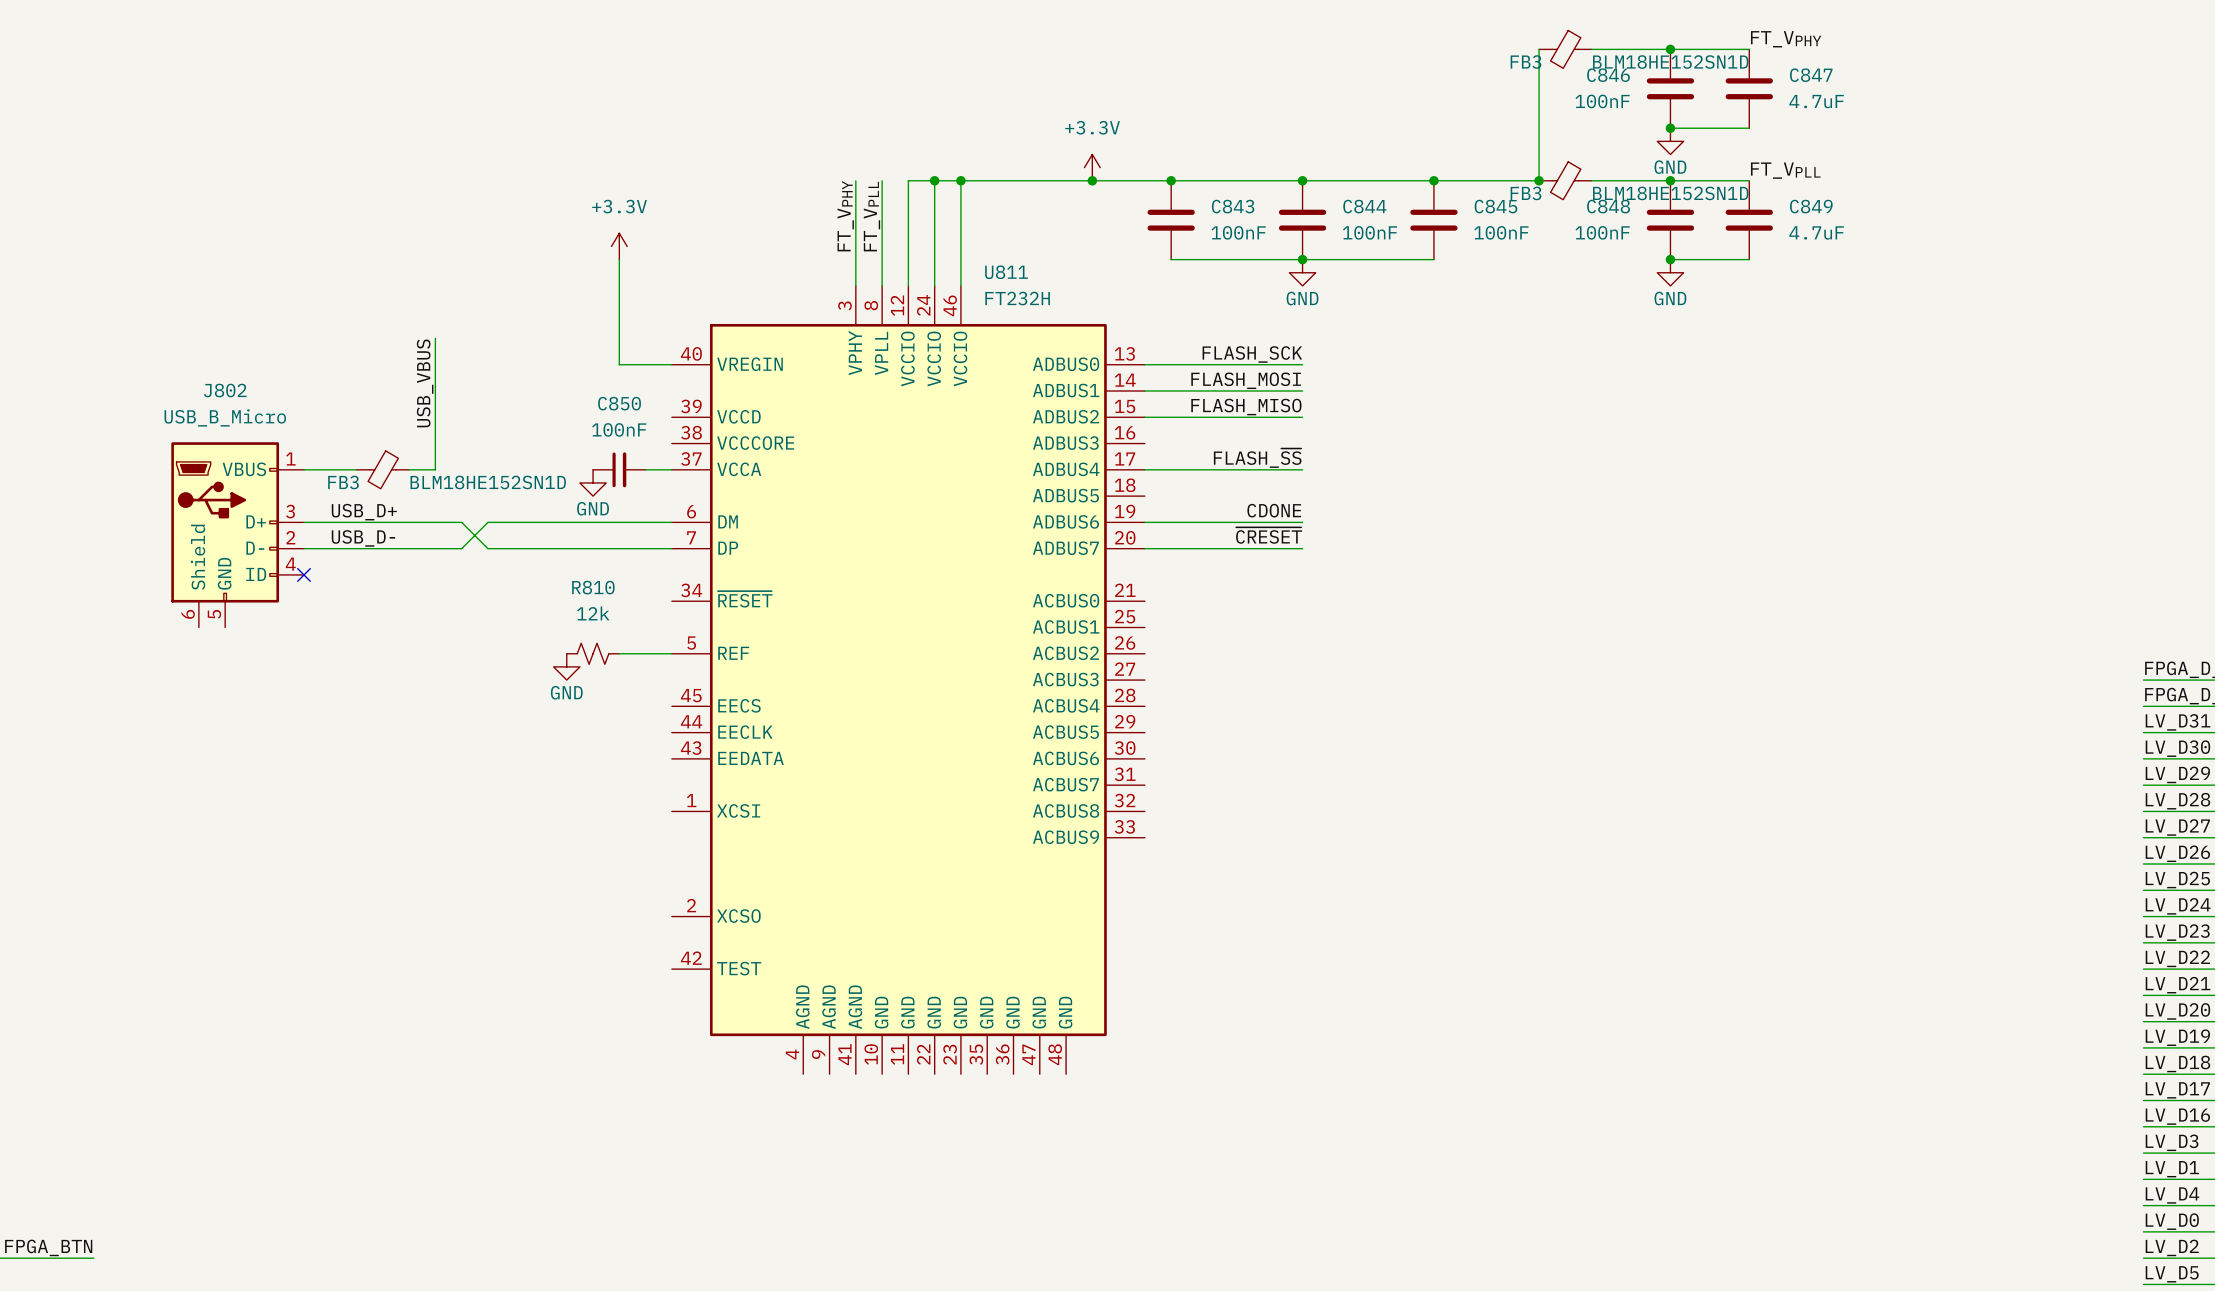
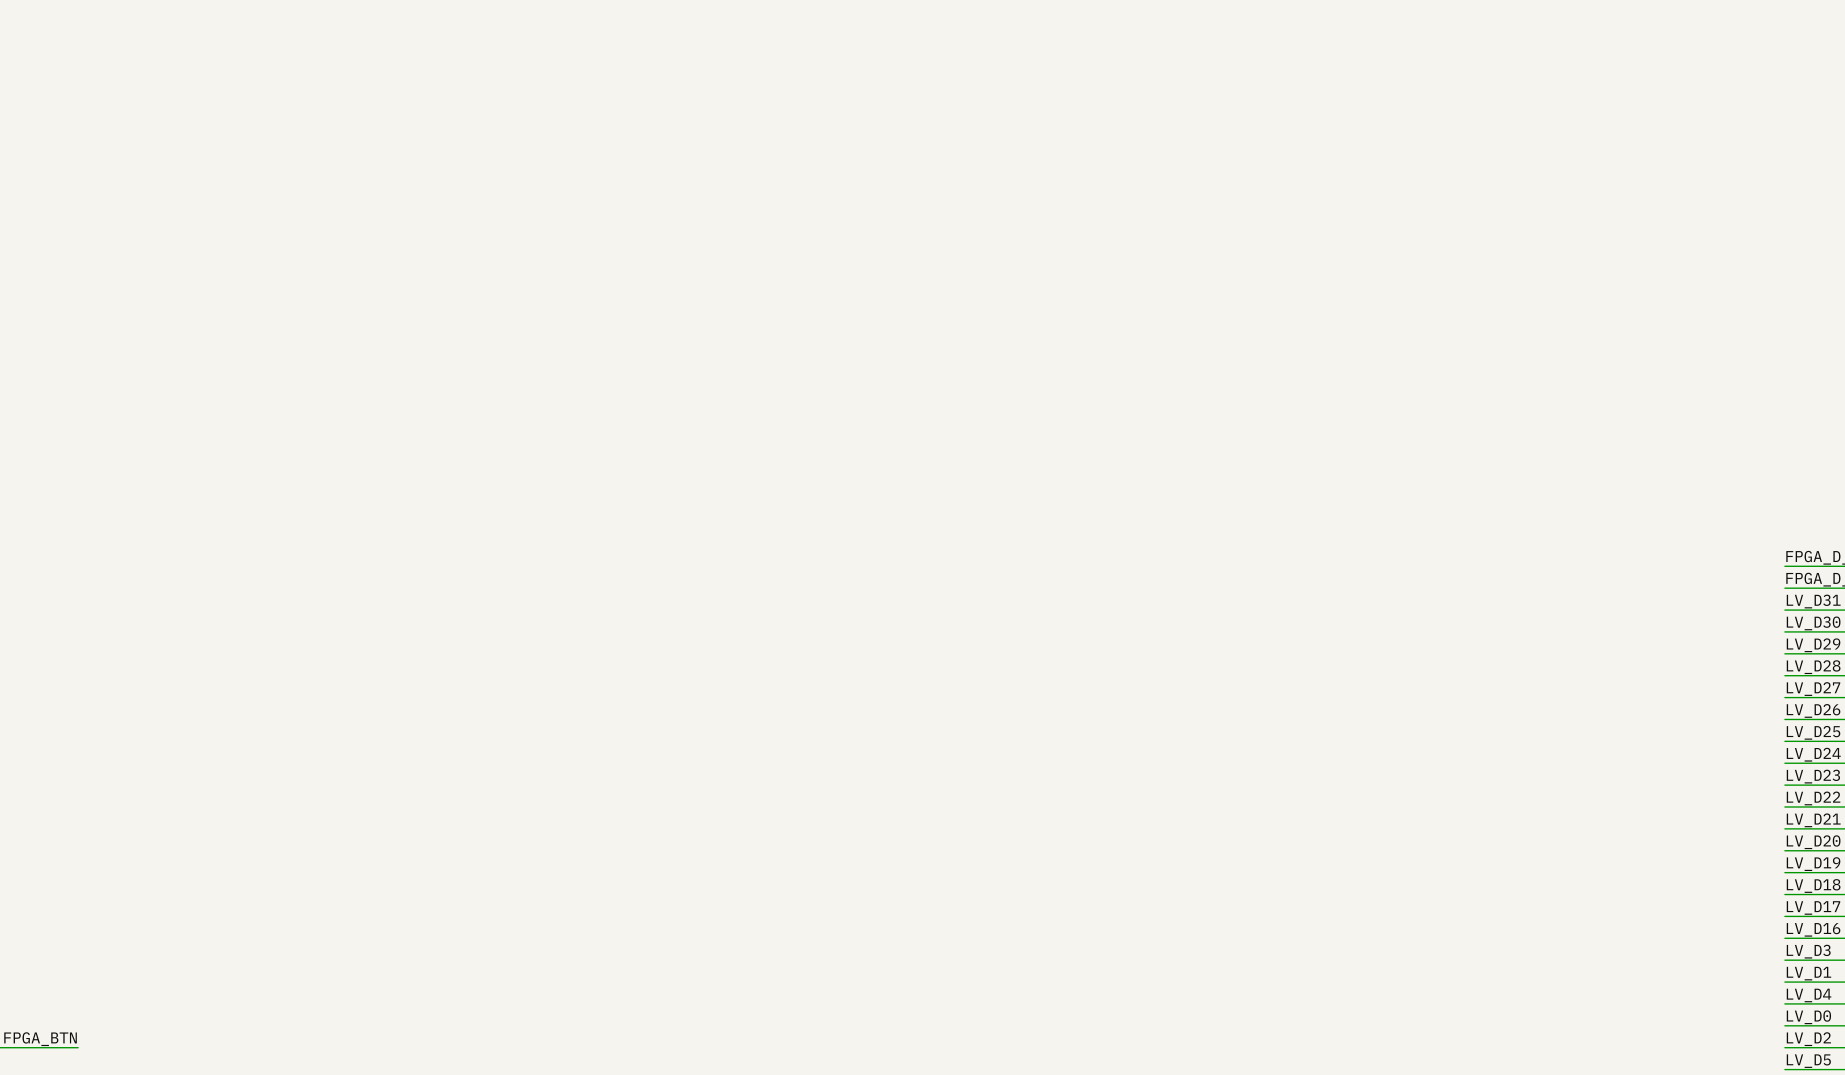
label: FT_VPHY (1786, 39) -> none
wire: (1539, 49) (1539, 180) (908, 180) (908, 285) -> none
FB3: BLM18HE152SN1D (1565, 49) -> none
wire: (1591, 49) (1749, 49) -> none
junction: (1670, 49) -> none
C846: 100nF (1670, 88) -> none
C847: 4.7uF (1749, 88) -> none
wire: (1670, 128) (1749, 128) -> none
junction: (1670, 128) -> none
power symbol: GND (1670, 141) -> none
power symbol: +3.3V (1092, 167) -> none
label: FT_VPLL (1785, 170) -> none
wire: (855, 180) (855, 285) -> none
wire: (882, 180) (882, 285) -> none
wire: (934, 180) (934, 285) -> none
junction: (934, 180) -> none
wire: (960, 180) (960, 285) -> none
junction: (960, 180) -> none
junction: (1092, 180) -> none
junction: (1171, 180) -> none
junction: (1302, 180) -> none
junction: (1433, 180) -> none
junction: (1539, 180) -> none
FB3: BLM18HE152SN1D (1565, 180) -> none
wire: (1591, 180) (1749, 180) -> none
junction: (1670, 180) -> none
label: FT_VPHY (845, 216) -> none
label: FT_VPLL (871, 216) -> none
C843: 100nF (1171, 220) -> none
C844: 100nF (1302, 220) -> none
C845: 100nF (1433, 220) -> none
C848: 100nF (1670, 220) -> none
C849: 4.7uF (1749, 220) -> none
power symbol: +3.3V (619, 246) -> none
wire: (619, 259) (619, 364) (671, 364) -> none
wire: (1171, 259) (1433, 259) -> none
junction: (1302, 259) -> none
wire: (1670, 259) (1749, 259) -> none
junction: (1670, 259) -> none
power symbol: GND (1302, 272) -> none
power symbol: GND (1670, 272) -> none
wire: (435, 338) (435, 469) (409, 469) -> none
label: FLASH_SCK (1252, 354) -> none
wire: (1144, 364) (1302, 364) -> none
label: FLASH_MOSI (1246, 380) -> none
label: USB_VBUS (425, 383) -> none
wire: (1144, 391) (1302, 391) -> none
label: FLASH_MISO (1246, 407) -> none
wire: (1144, 417) (1302, 417) -> none
label: FLASH_~{SS} (1257, 458) -> none
wire: (303, 469) (356, 469) -> none
FB3: BLM18HE152SN1D (382, 469) -> none
C850: 100nF (619, 469) -> none
wire: (645, 469) (671, 469) -> none
wire: (1144, 469) (1302, 469) -> none
power symbol: GND (593, 482) -> none
label: CDONE (1274, 510) -> none
label: USB_D+ (364, 512) -> none
wire: (303, 522) (461, 522) (487, 548) (671, 548) -> none
wire: (671, 522) (487, 522) (461, 548) (303, 548) -> none
wire: (1144, 522) (1302, 522) -> none
J802: USB_B_Micro (237, 534) -> none
label: ~{CRESET} (1269, 535) -> none
label: USB_D- (363, 538) -> none
wire: (1144, 548) (1302, 548) -> none
no-connect mark: (303, 574) -> none
R810: 12k (593, 653) -> none
wire: (619, 653) (671, 653) -> none
power symbol: GND (566, 666) -> none
U811: FT232H (908, 680) -> none

